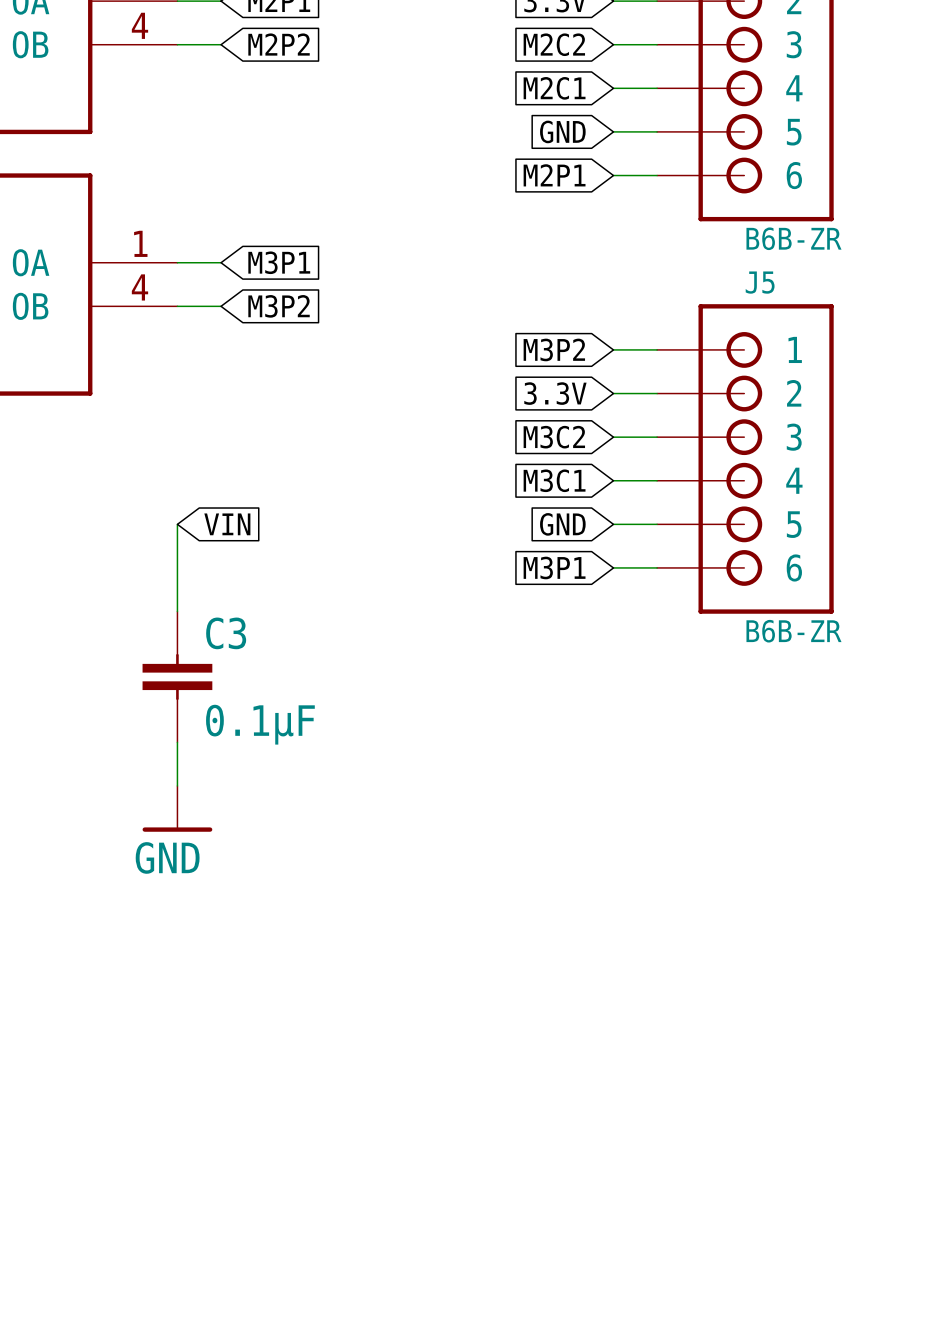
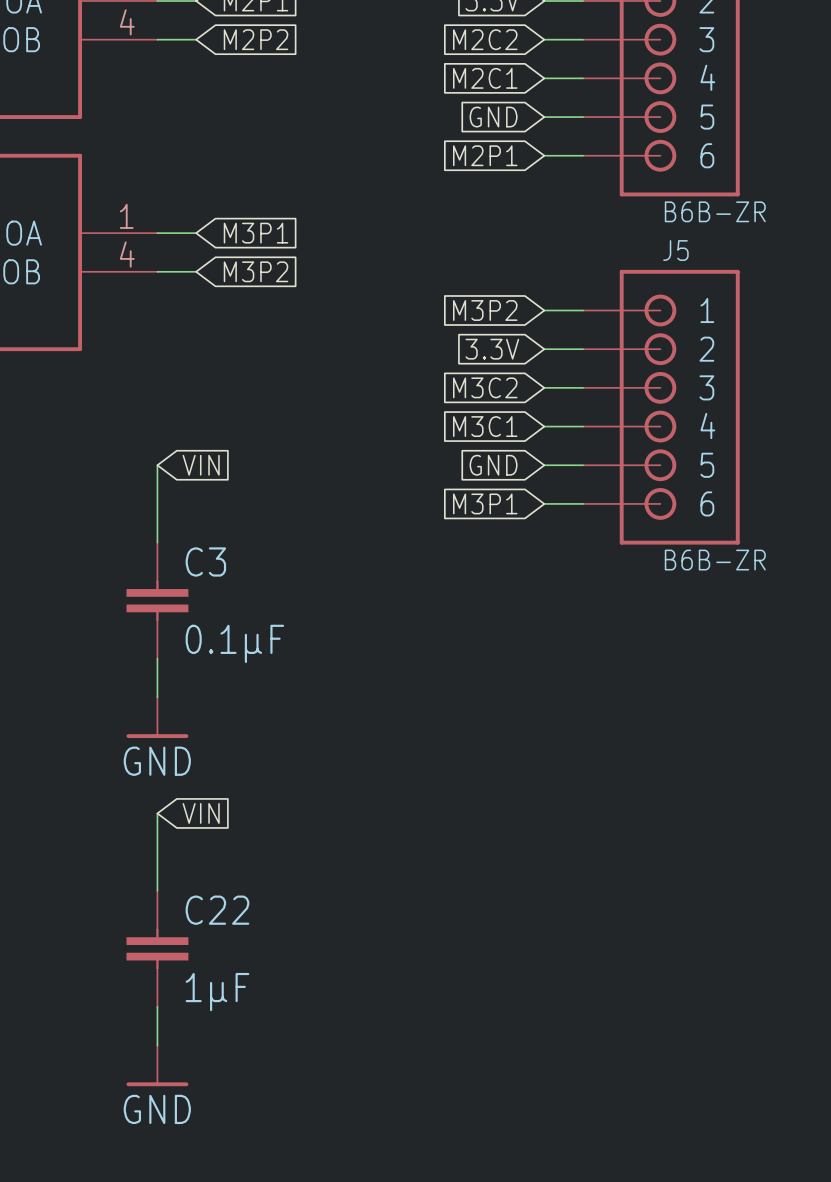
wire: none -> (157, 813) (157, 890)
global label: none -> VIN (201, 813)
C22: none -> 1µF (157, 948)
wire: none -> (157, 1006) (157, 1045)
power symbol: none -> GND (157, 1065)

